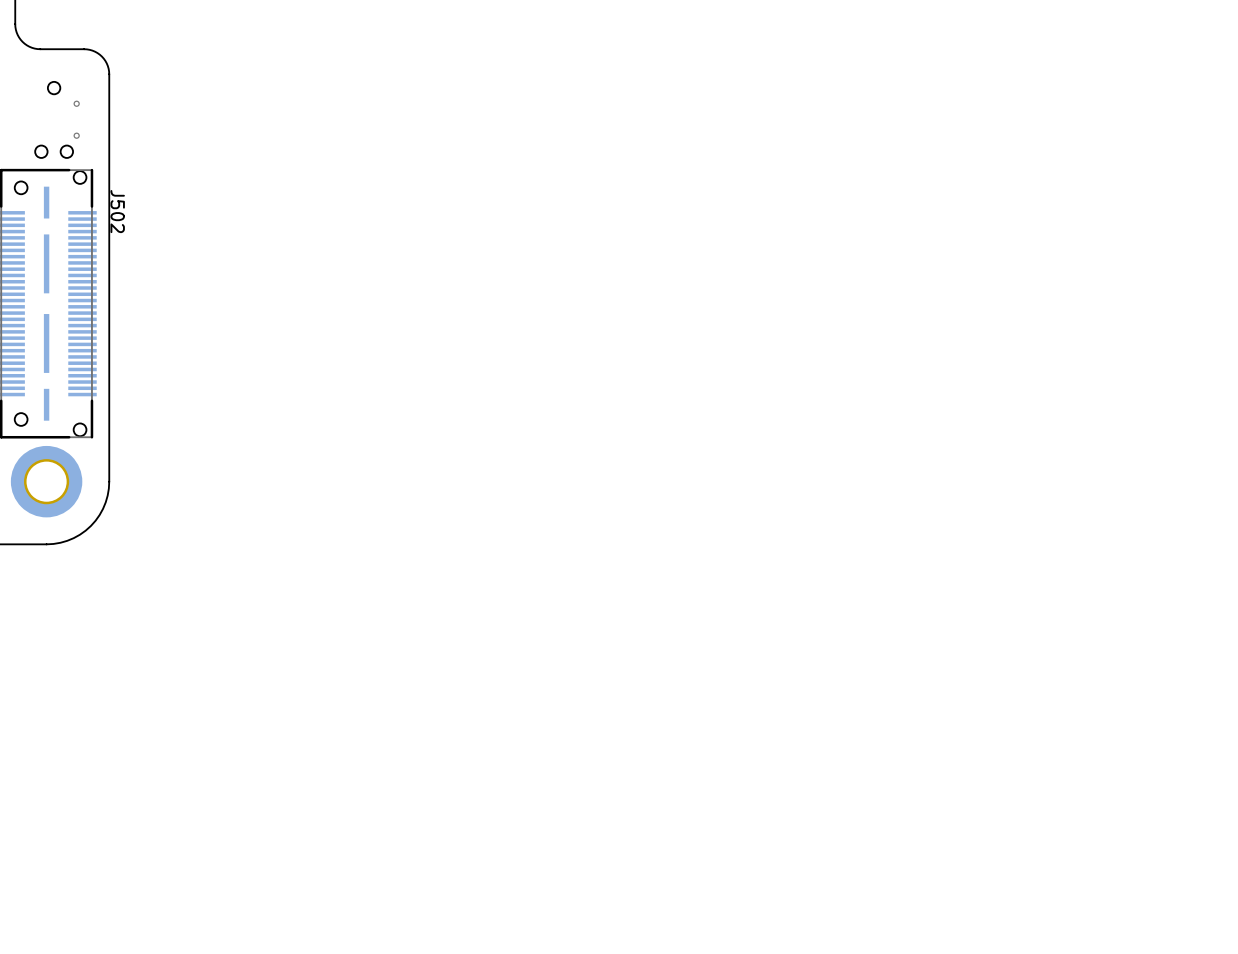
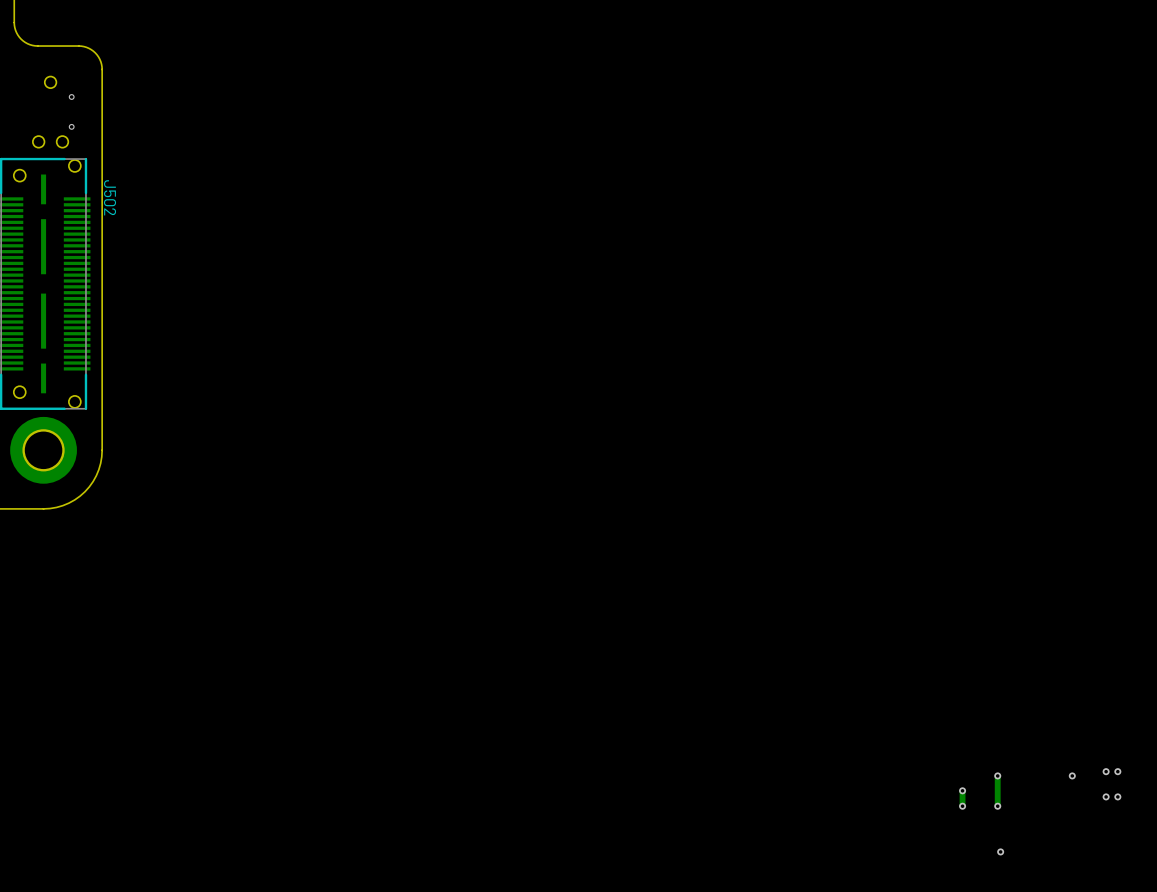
via: none -> (1106, 771)
via: none -> (1117, 771)
track: none -> (997, 775) (997, 806)
via: none -> (997, 775)
via: none -> (1072, 775)
track: none -> (962, 790) (962, 806)
via: none -> (962, 790)
via: none -> (1106, 796)
via: none -> (1117, 796)
via: none -> (962, 806)
via: none -> (997, 806)
via: none -> (1000, 851)

